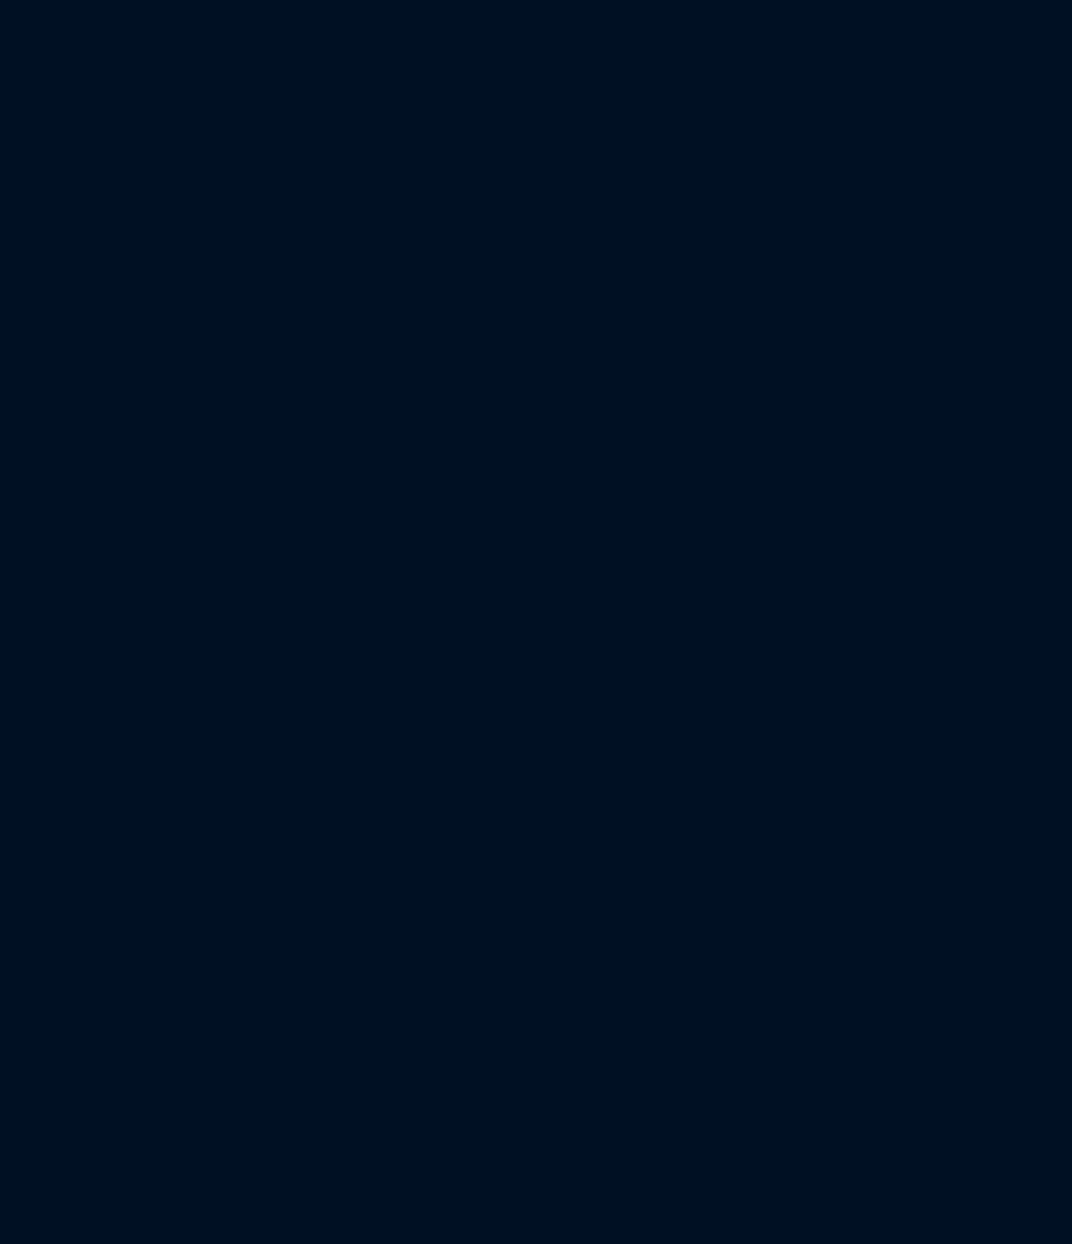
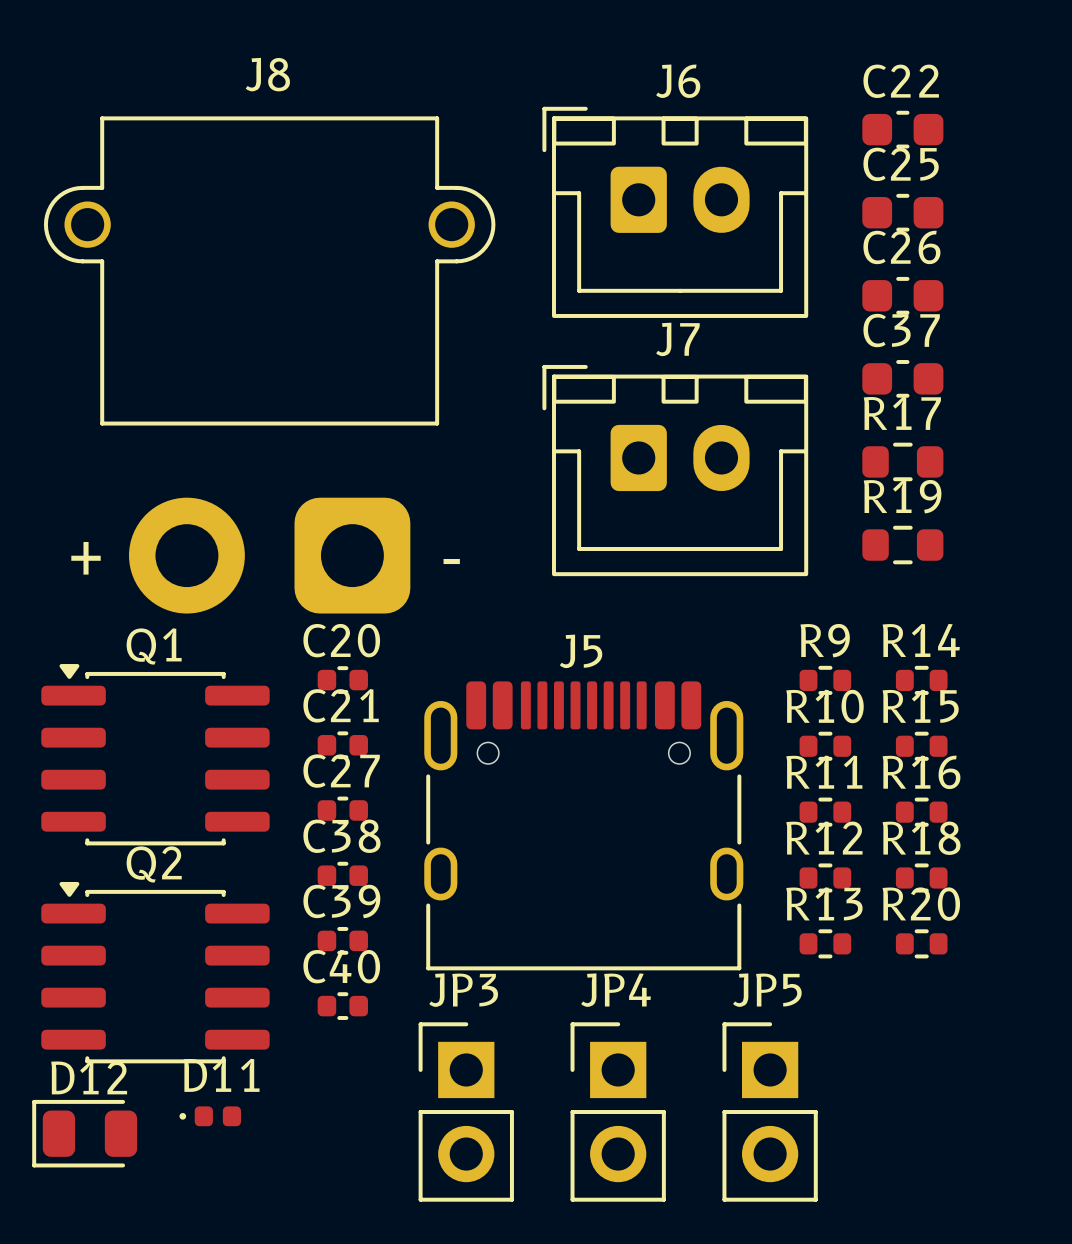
C22: none -> (902, 129)
J6: none -> (675, 212)
C25: none -> (902, 212)
C26: none -> (902, 295)
J8: none -> (269, 364)
C37: none -> (902, 378)
R17: none -> (902, 461)
J7: none -> (675, 470)
R19: none -> (902, 545)
C20: none -> (342, 680)
R9: none -> (825, 680)
R14: none -> (921, 680)
C21: none -> (342, 745)
R10: none -> (825, 746)
R15: none -> (921, 746)
Q1: none -> (155, 754)
C27: none -> (342, 810)
R11: none -> (825, 812)
R16: none -> (921, 812)
J5: none -> (583, 825)
C38: none -> (342, 875)
R12: none -> (825, 877)
R18: none -> (921, 877)
C39: none -> (342, 940)
R13: none -> (825, 943)
R20: none -> (921, 943)
Q2: none -> (155, 972)
C40: none -> (342, 1006)
JP3: none -> (466, 1112)
JP4: none -> (618, 1112)
JP5: none -> (770, 1112)
D11: none -> (210, 1116)
D12: none -> (84, 1133)

